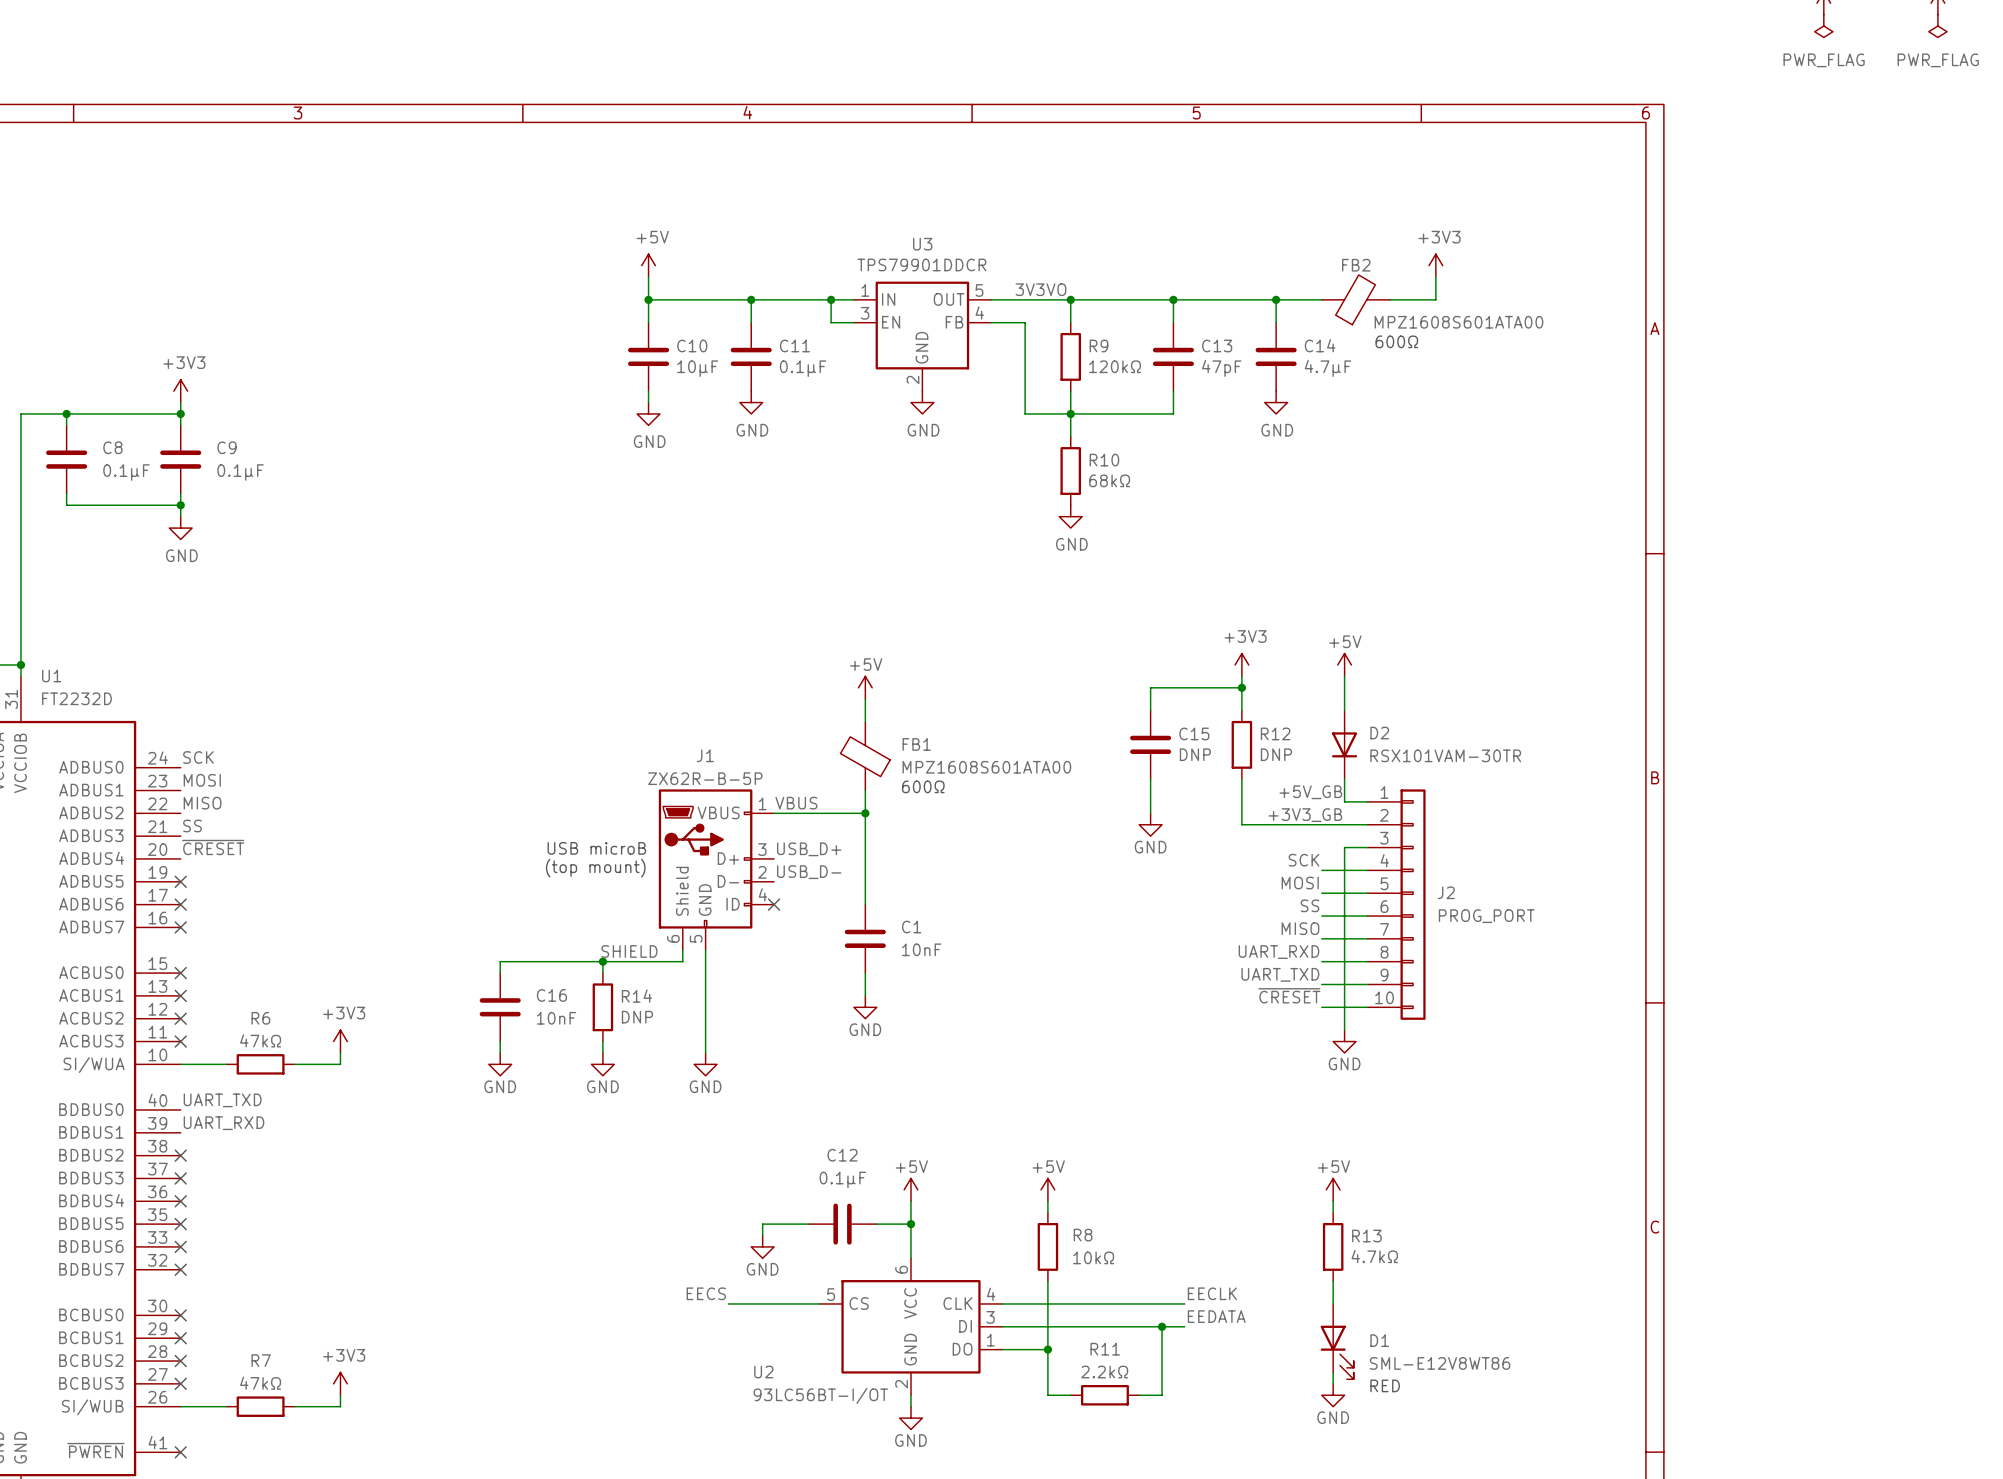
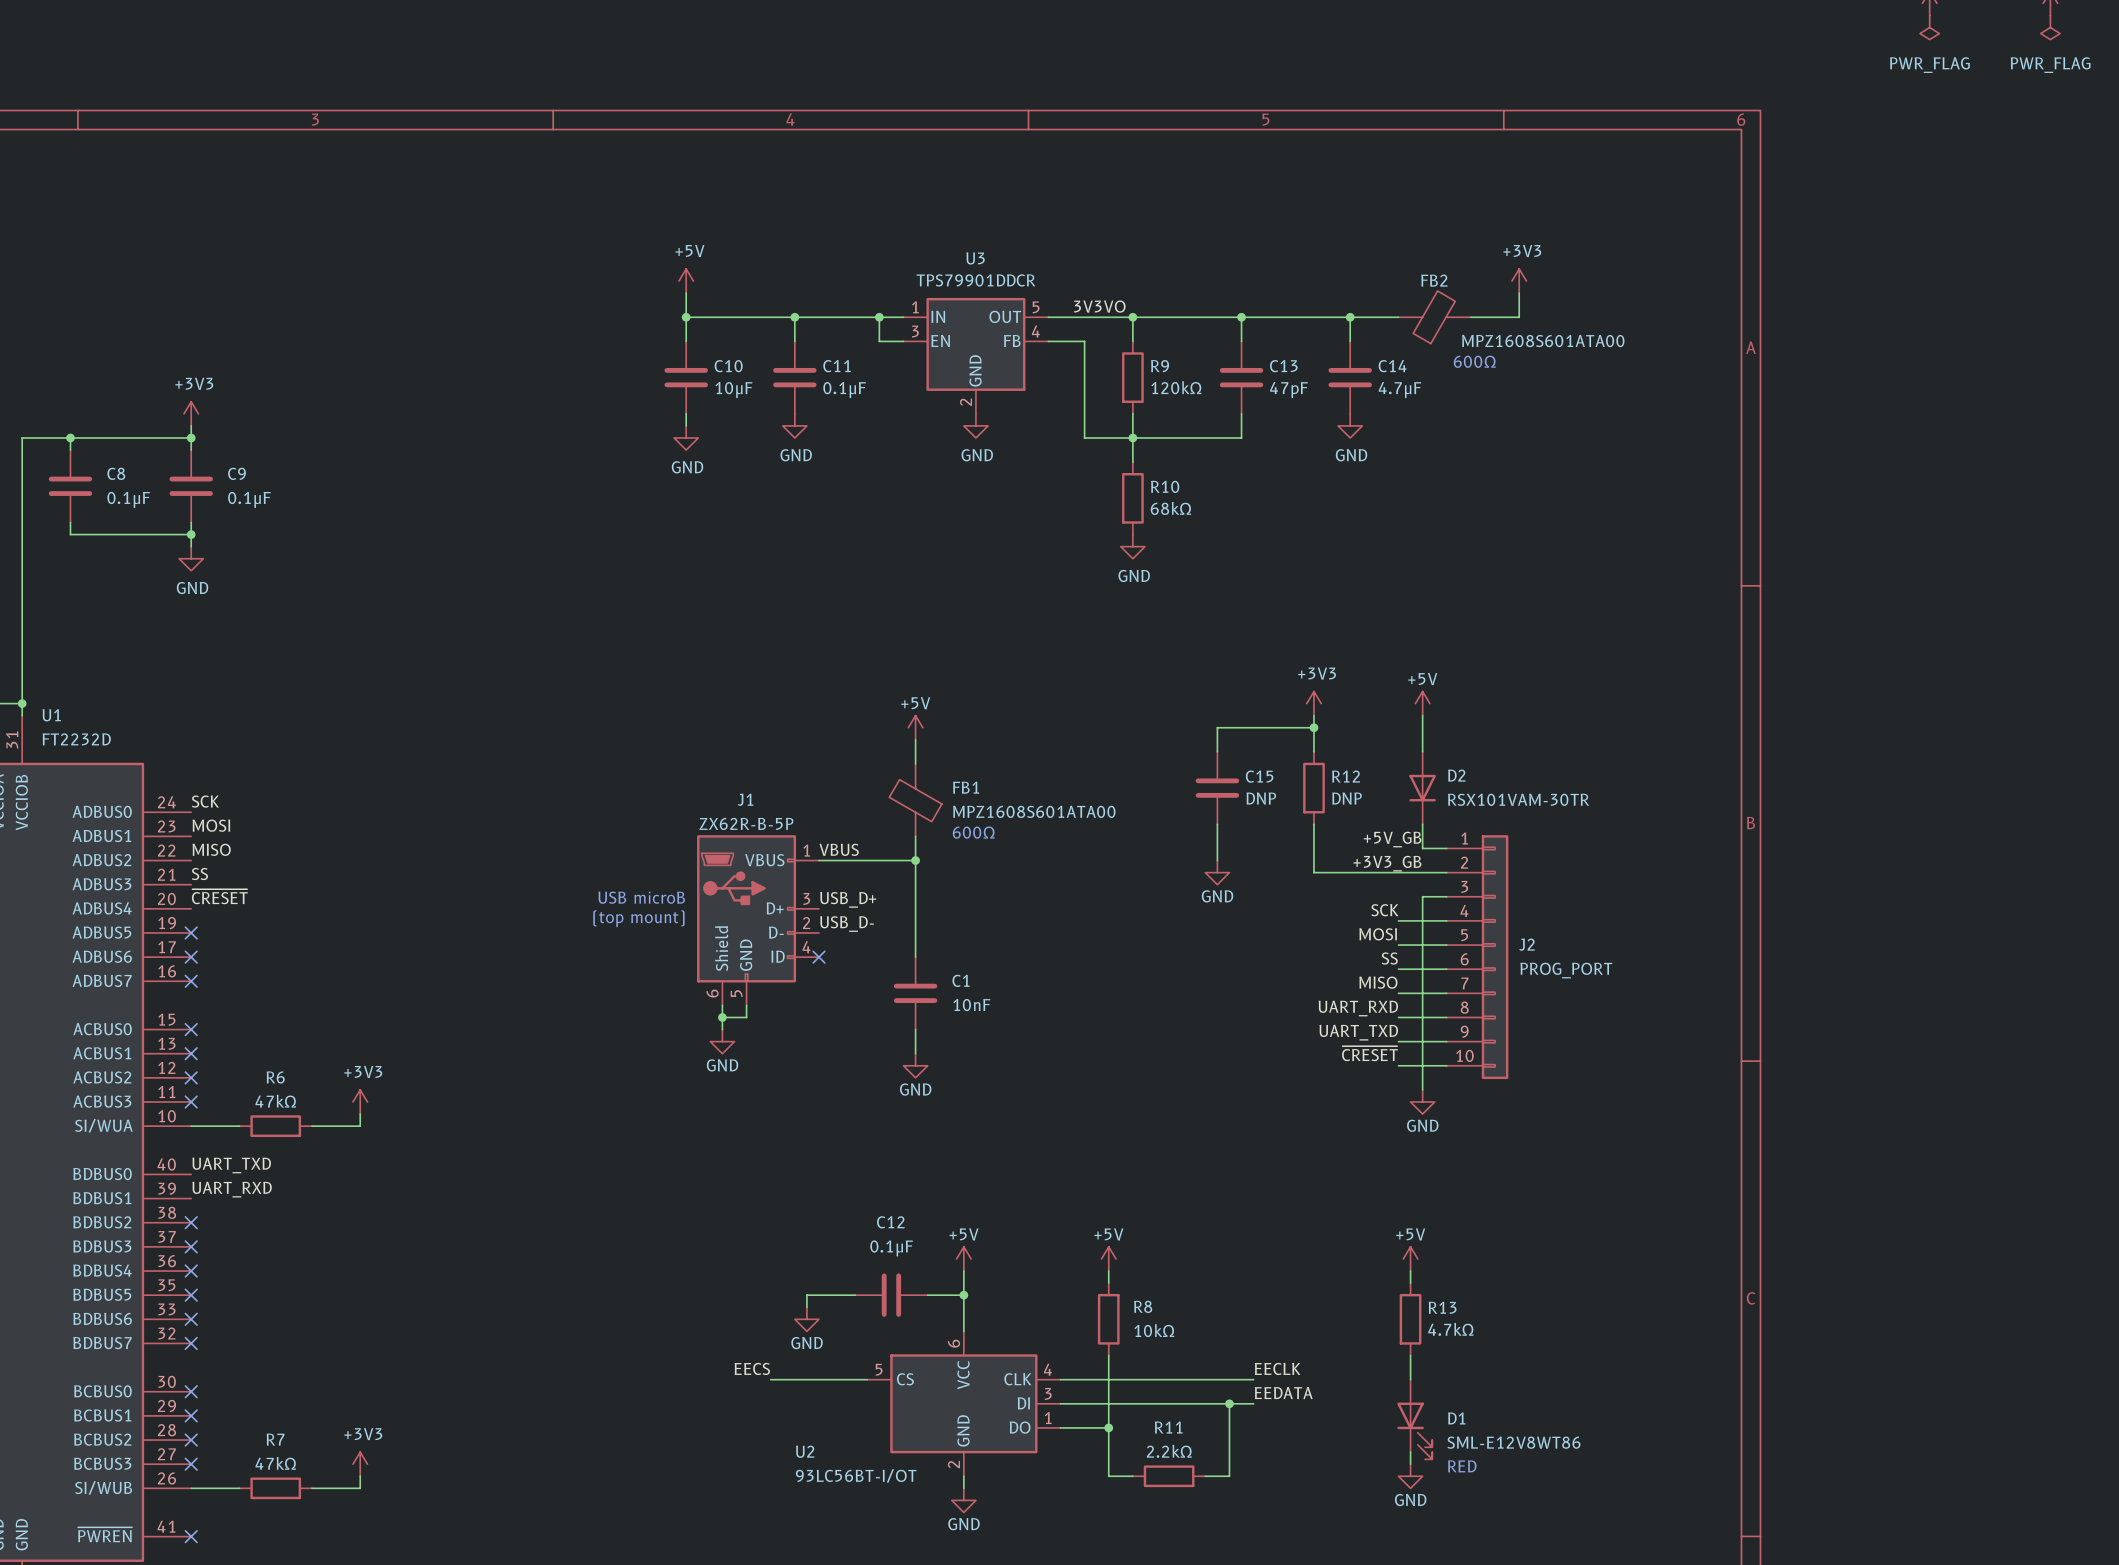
label: SHIELD (629, 951) -> none
wire: (602, 961) (602, 973) -> none
junction: (602, 961) -> none
wire: (682, 961) (500, 961) (500, 973) -> none
junction: none -> (722, 1017)
wire: (705, 961) (705, 1052) -> (746, 1017) (722, 1017) (722, 1029)
power symbol: none -> GND (722, 1041)
C16: 10nF (500, 1007) -> none
R14: DNP (602, 1007) -> none
wire: (500, 1041) (500, 1052) -> none
wire: (602, 1041) (602, 1052) -> none
power symbol: GND (500, 1064) -> none
power symbol: GND (602, 1064) -> none
power symbol: GND (705, 1064) -> none

